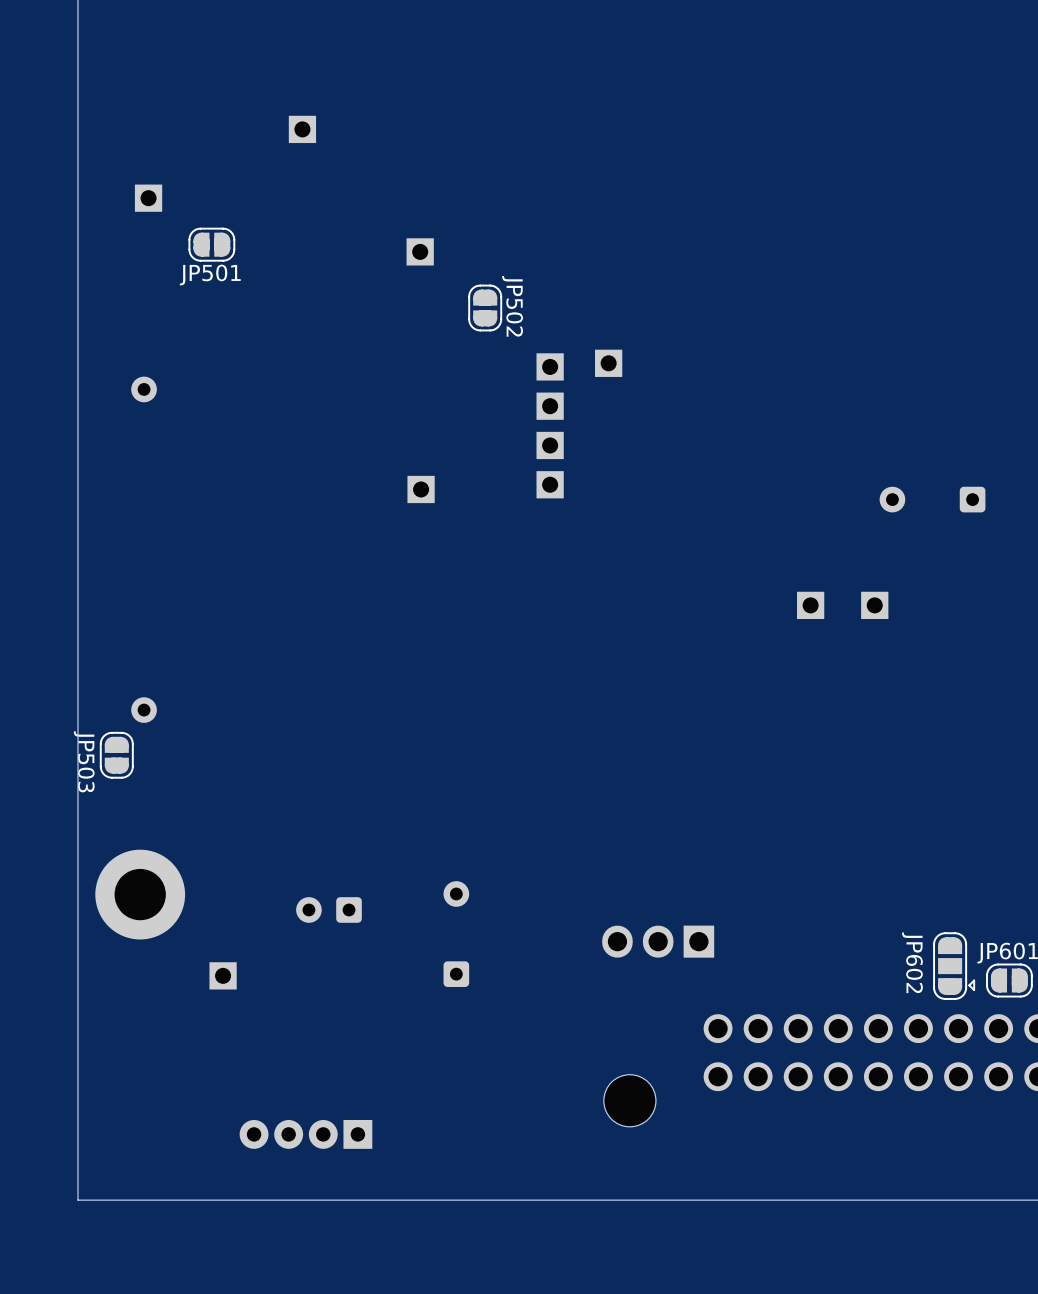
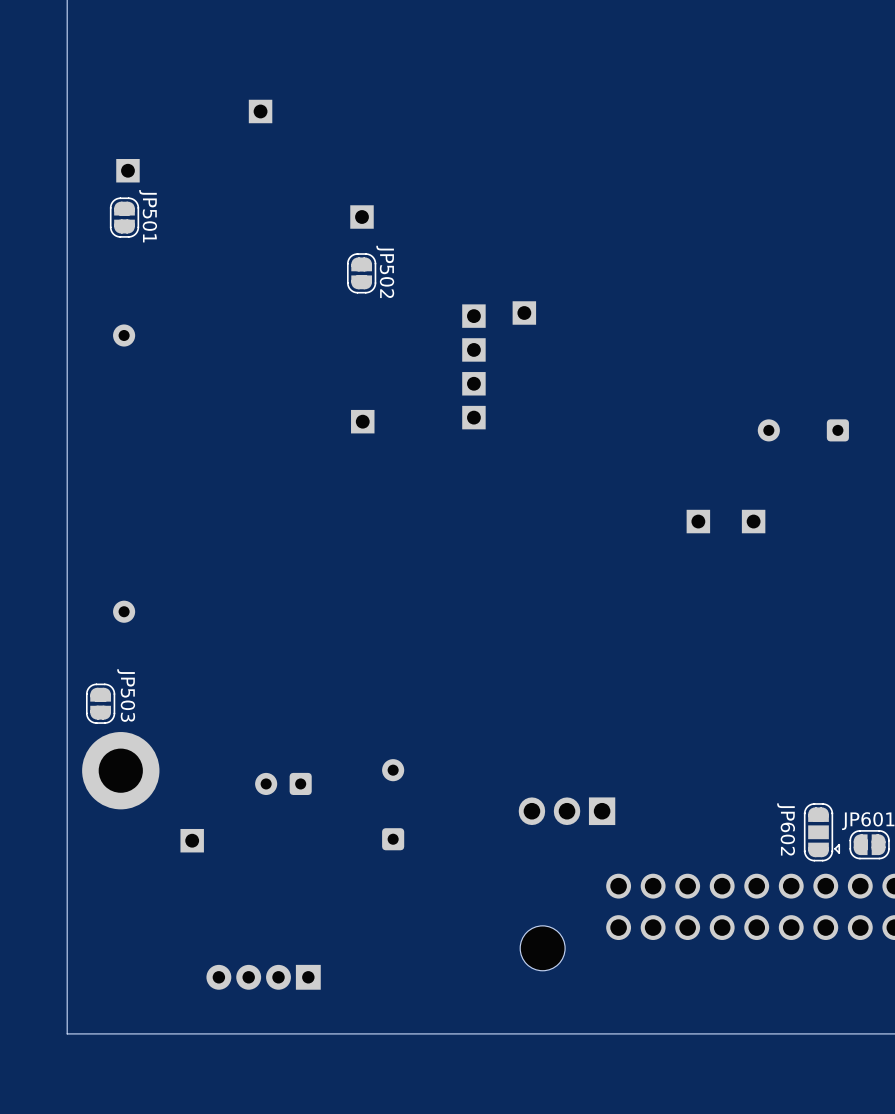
JP501 rotation: 0° (211, 244) -> 90° clockwise (124, 217)
JP501 position: (211, 244) -> (124, 217)
JP501 name position: JP501 (210, 274) -> JP501 (148, 216)
JP502 position: (485, 308) -> (361, 273)
JP503 position: (116, 755) -> (100, 703)
JP503 name position: JP503 (84, 761) -> JP503 (126, 695)

